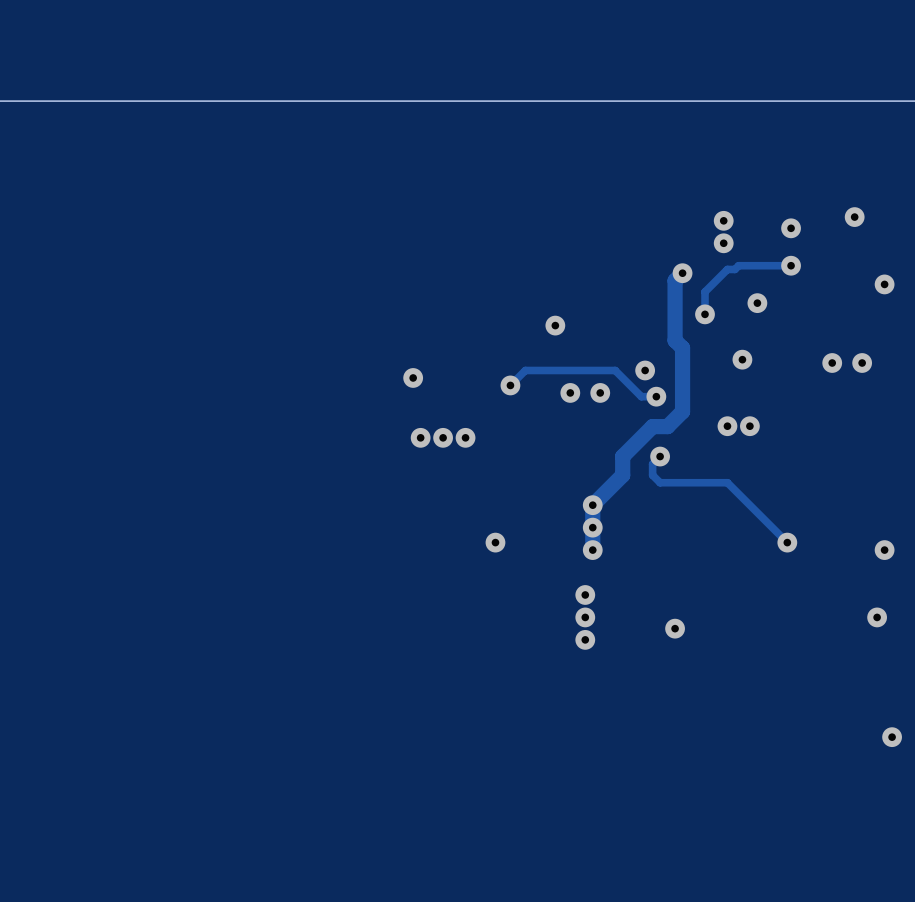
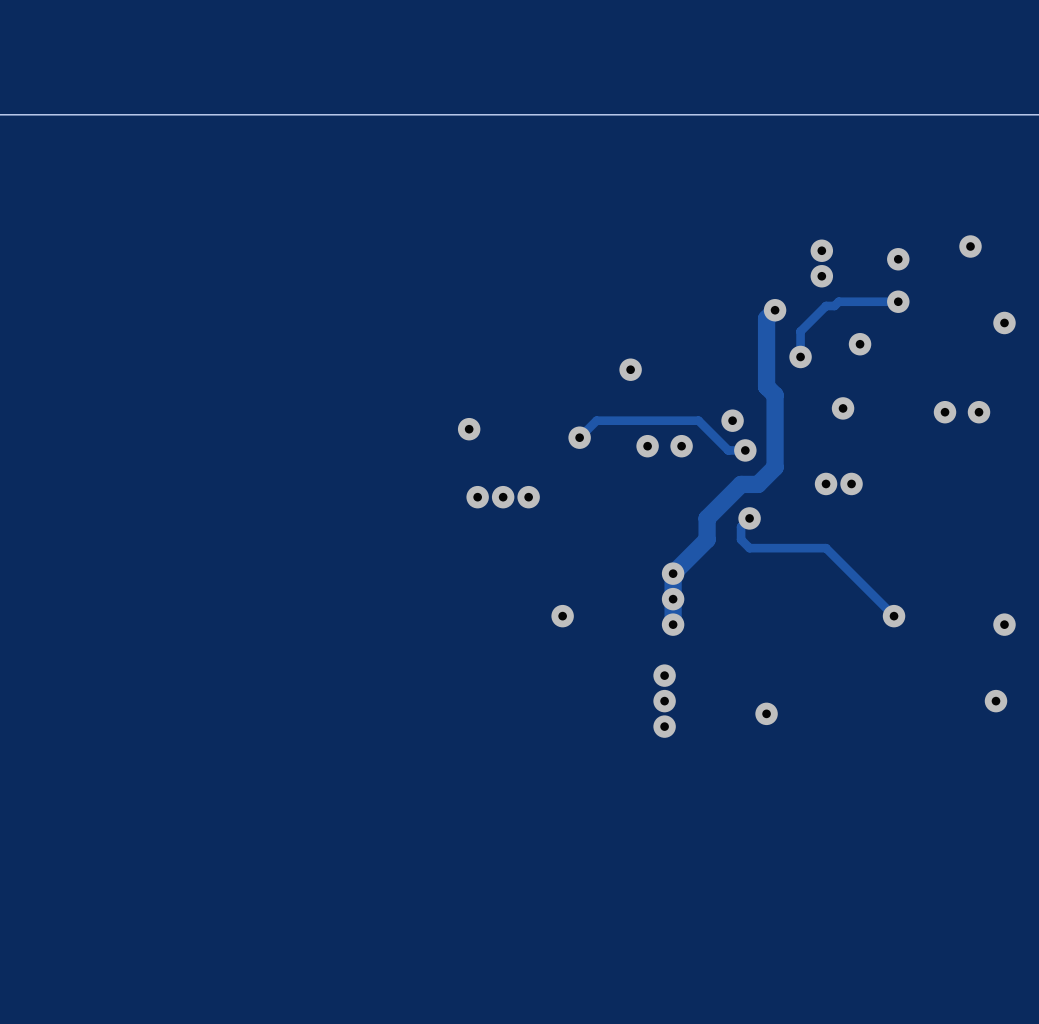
via: (892, 737) -> none

